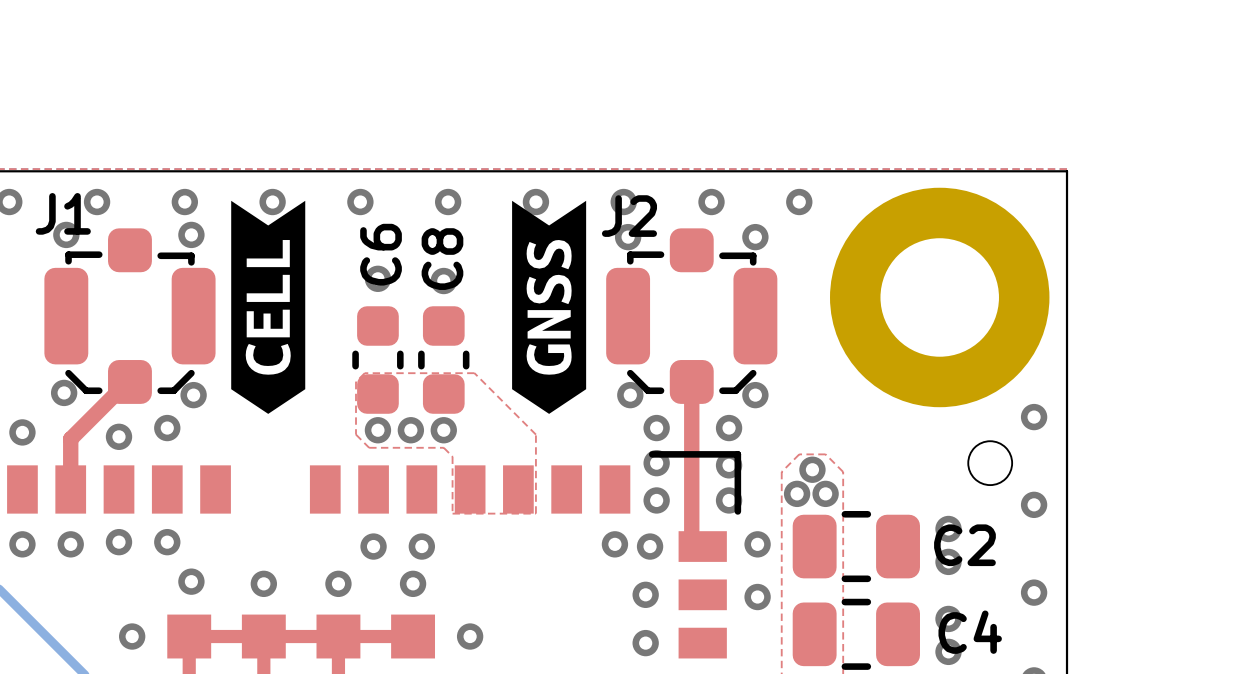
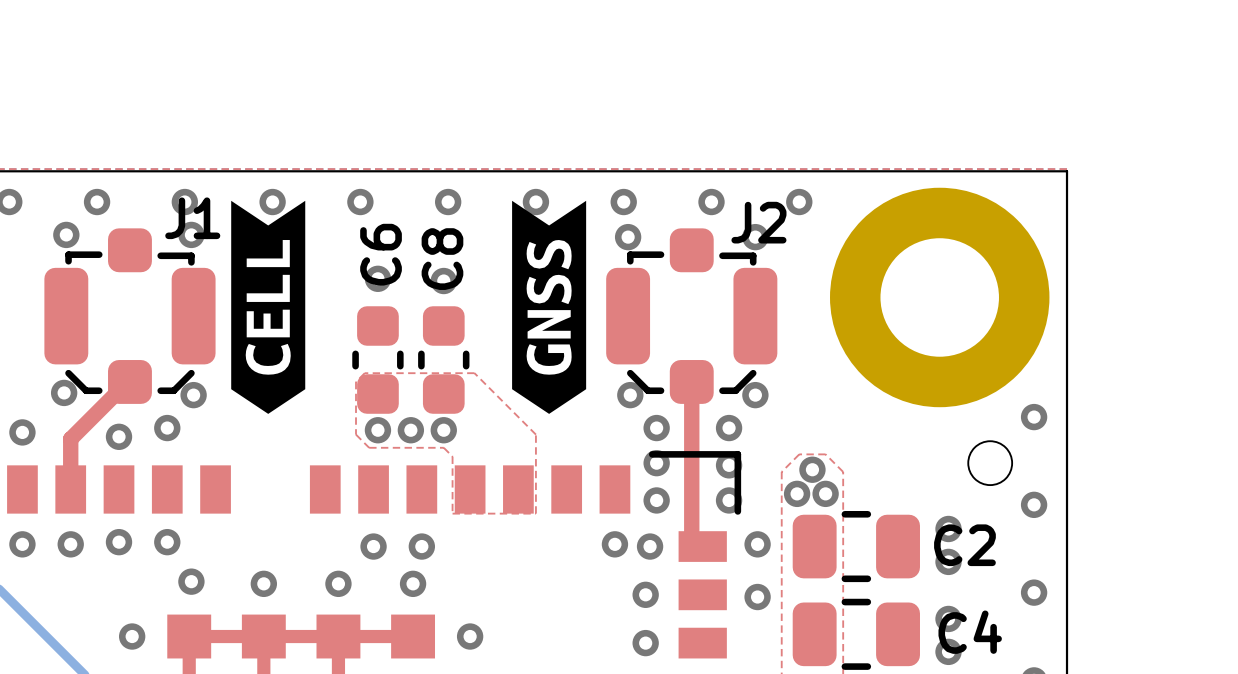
J1 name position: J1 (63, 213) -> J1 (192, 218)
J2 name position: J2 (629, 216) -> J2 (758, 222)

